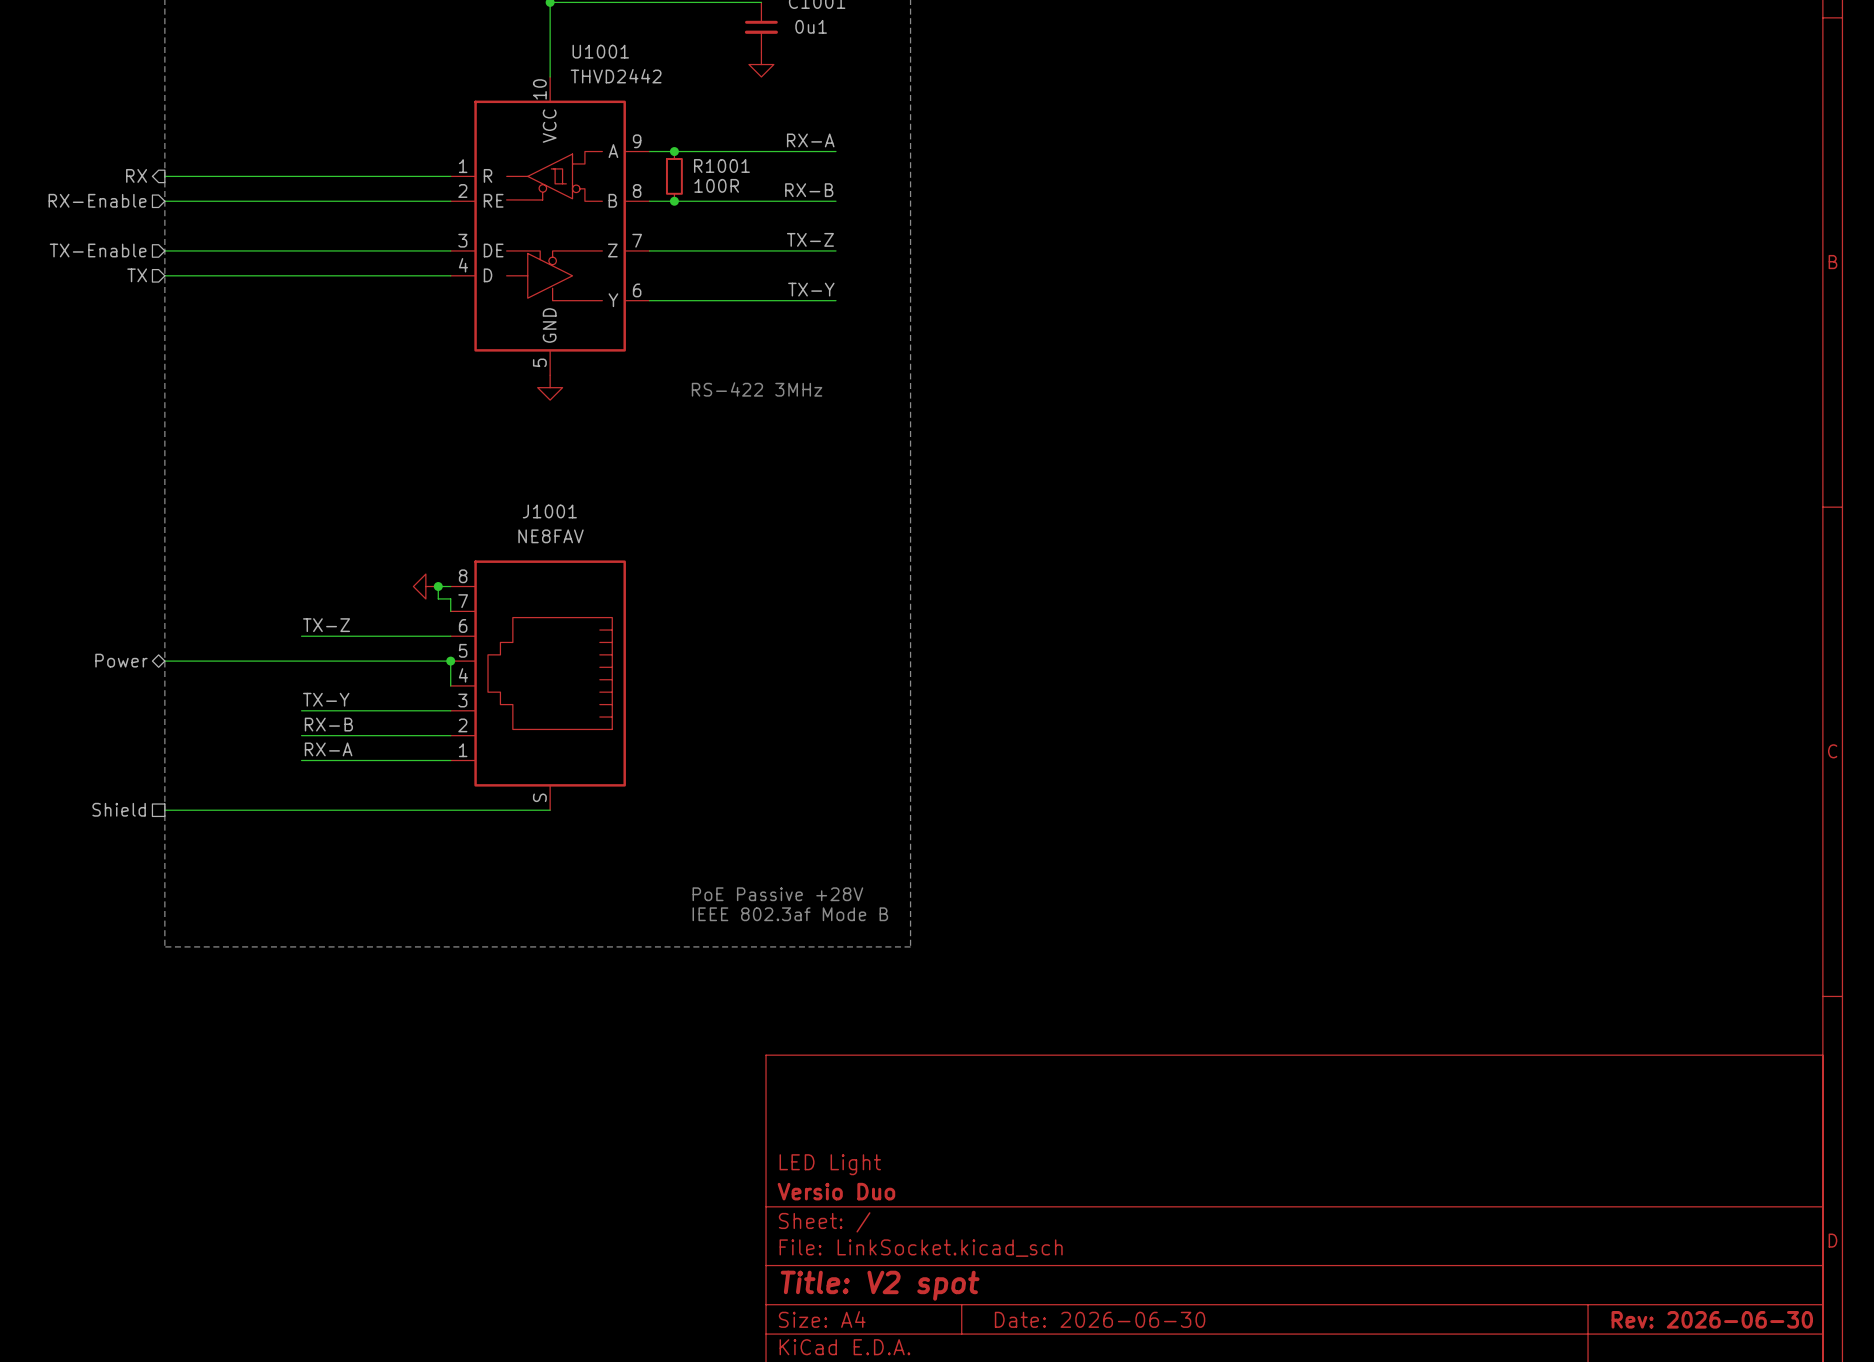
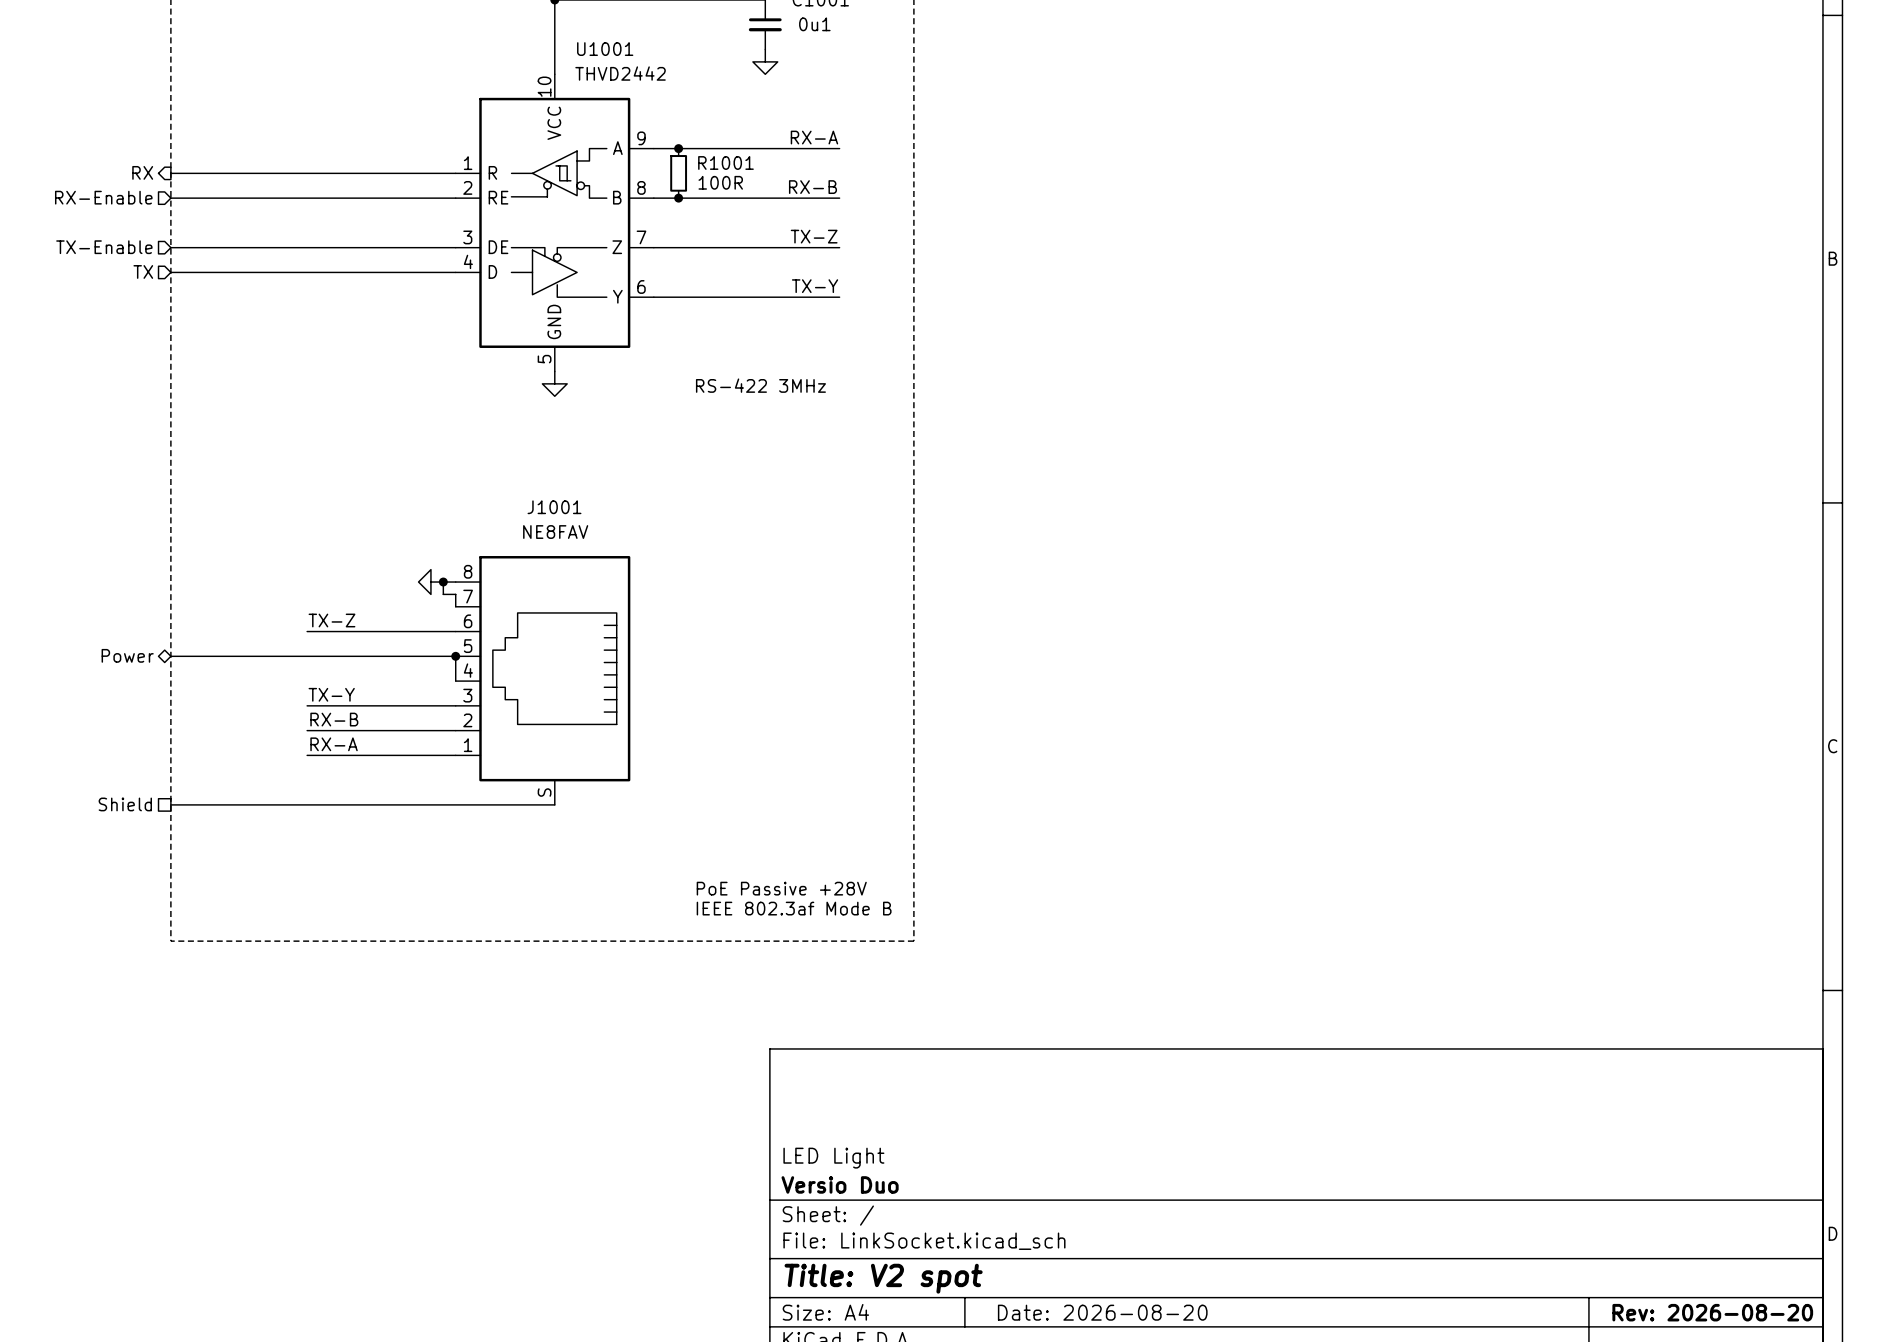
title block: Date: 2026-06-30 (1100, 1319) -> Date: 2026-08-20 (1102, 1312)
title block: Rev: 2026-06-30 (1712, 1319) -> Rev: 2026-08-20 (1712, 1312)

